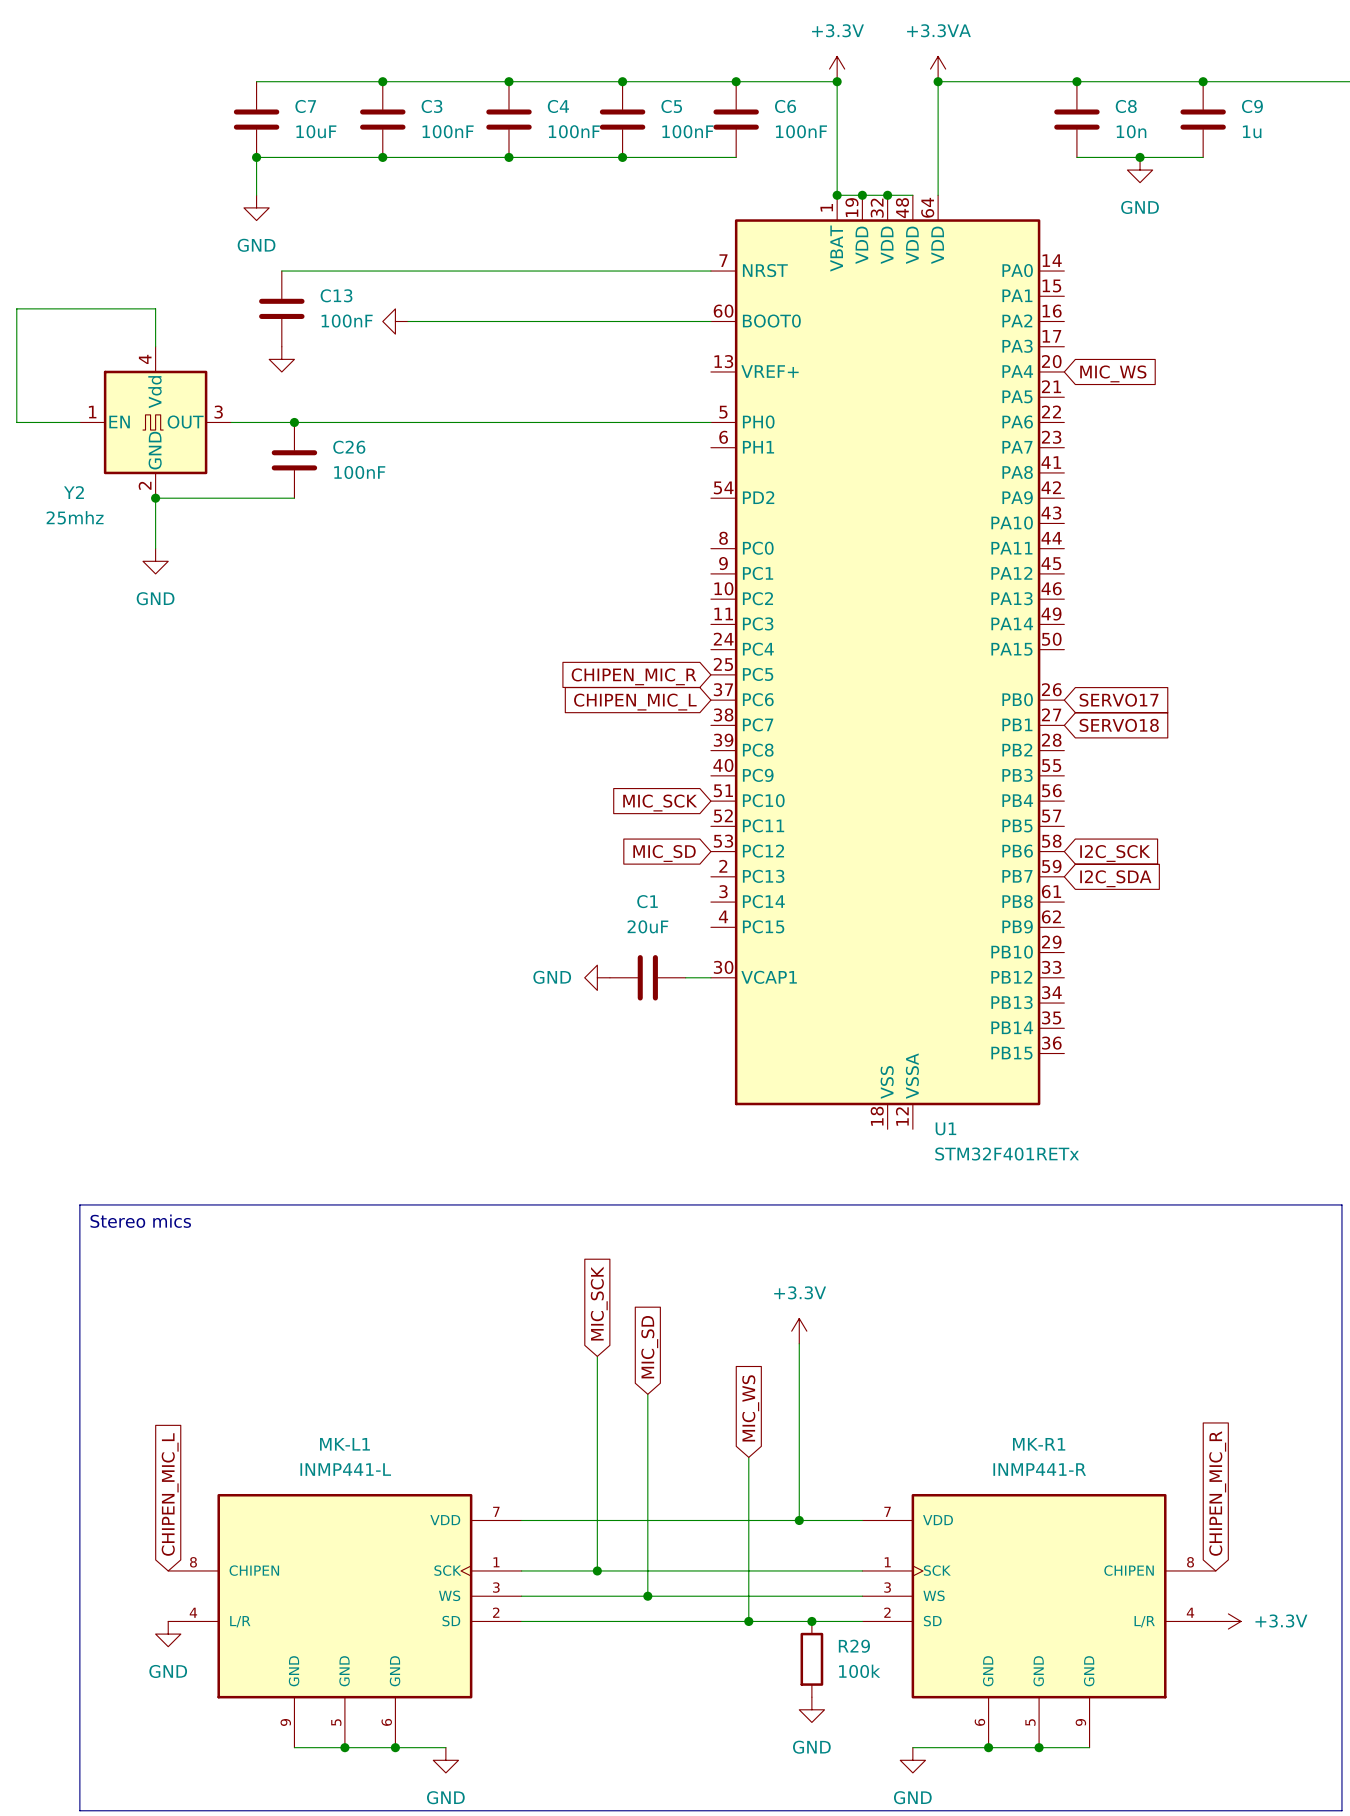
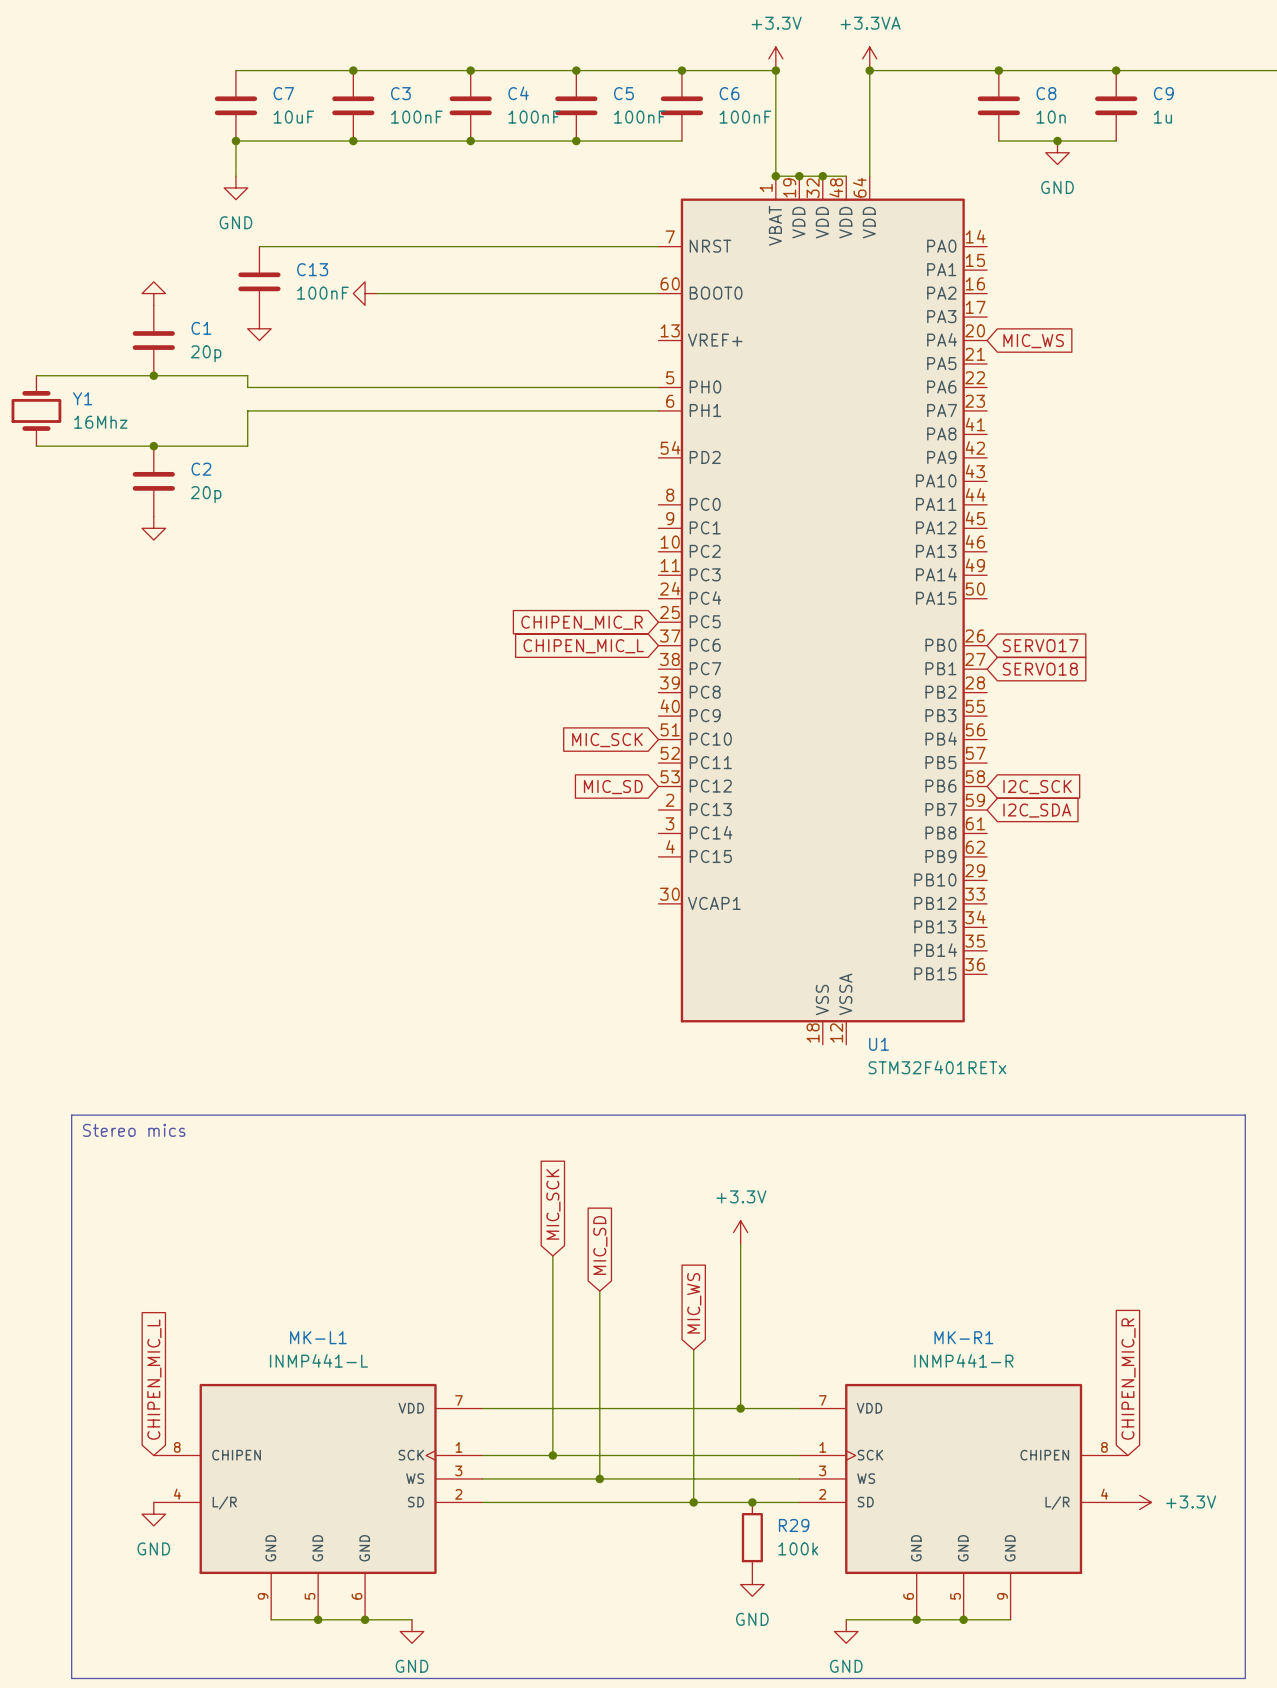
power symbol: none -> (153, 293)
wire: (155, 346) (155, 308) (16, 308) (16, 422) (79, 422) -> none
junction: none -> (153, 375)
Y2: 25mhz (155, 422) -> none
wire: (231, 422) (269, 422) -> (36, 375) (247, 375) (247, 387)
junction: (294, 422) -> none
Y1: none -> 16Mhz (36, 410)
wire: none -> (658, 410) (247, 410) (247, 446) (36, 446)
C26: 100nF (294, 460) -> none
junction position: (155, 498) -> (153, 446)
wire: (294, 498) (155, 498) (155, 548) -> none
C2: none -> 20p (153, 481)
power symbol: GND (155, 561) -> none
power symbol: none -> (153, 528)
C1 name position: C1 (647, 901) -> C1 (201, 328)
C1 value: 20uF (647, 926) -> 20p (206, 353)
power symbol: GND (597, 977) -> none
C1 rotation: 0° (647, 977) -> 90° clockwise (153, 340)
C1 position: (647, 977) -> (153, 340)
wire: (685, 977) (710, 977) -> none

